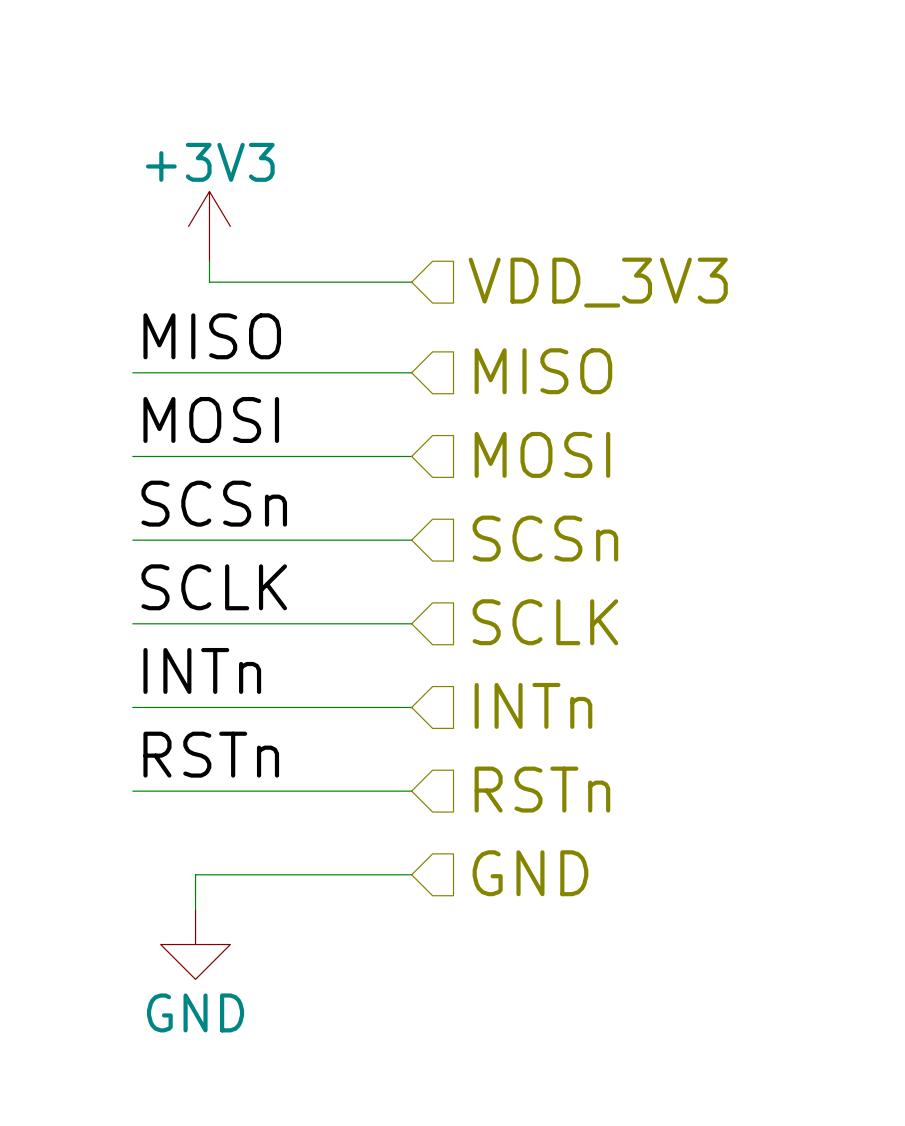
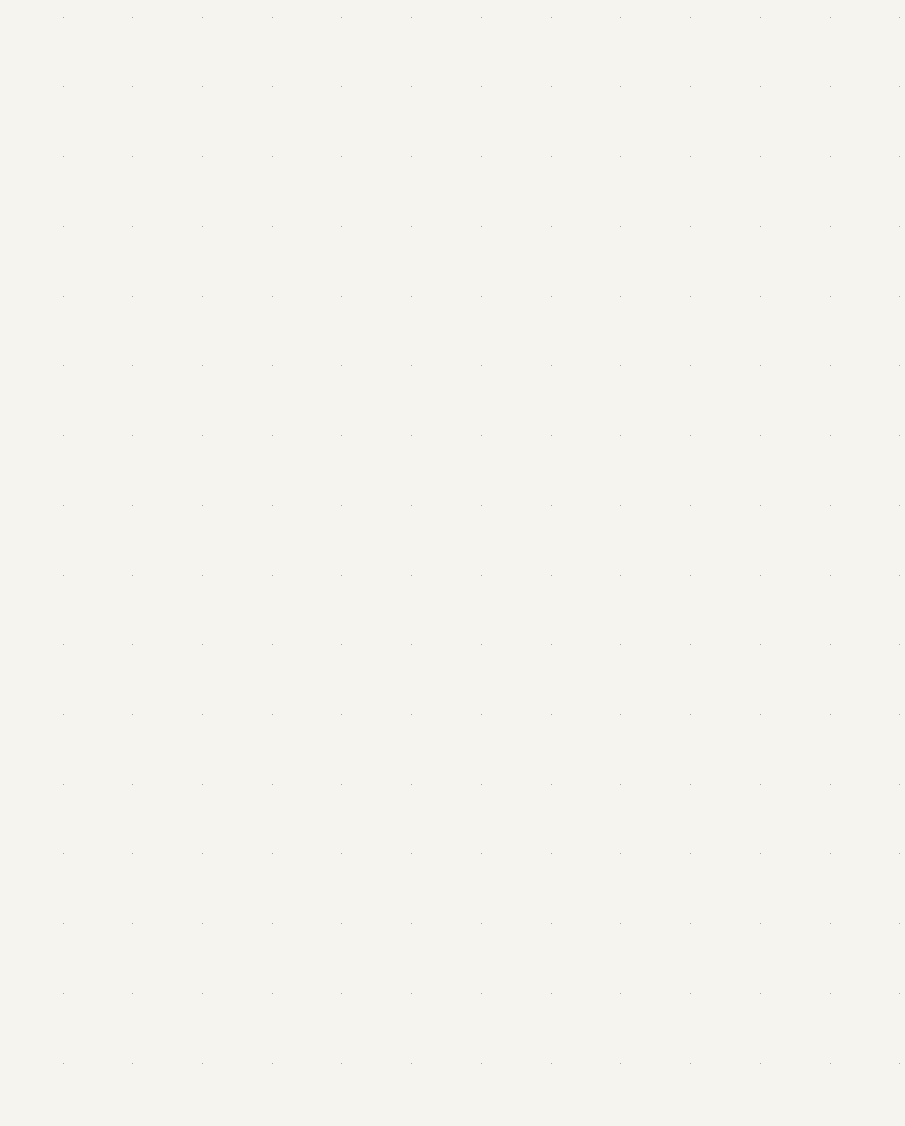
power symbol: +3V3 (209, 226) -> none
wire: (209, 261) (209, 282) (411, 282) -> none
hierarchical label: VDD_3V3 (598, 282) -> none
label: MISO (212, 336) -> none
hierarchical label: MISO (543, 371) -> none
wire: (132, 372) (411, 372) -> none
label: MOSI (211, 419) -> none
hierarchical label: MOSI (542, 454) -> none
wire: (132, 456) (411, 456) -> none
label: SCSn (214, 503) -> none
hierarchical label: SCSn (545, 538) -> none
wire: (132, 540) (411, 540) -> none
label: SCLK (214, 587) -> none
hierarchical label: SCLK (545, 622) -> none
wire: (132, 623) (411, 623) -> none
label: INTn (202, 670) -> none
hierarchical label: INTn (533, 705) -> none
wire: (132, 707) (411, 707) -> none
label: RSTn (211, 754) -> none
hierarchical label: RSTn (542, 789) -> none
wire: (132, 791) (411, 791) -> none
hierarchical label: GND (530, 873) -> none
wire: (411, 874) (195, 874) (195, 909) -> none
power symbol: GND (195, 944) -> none

